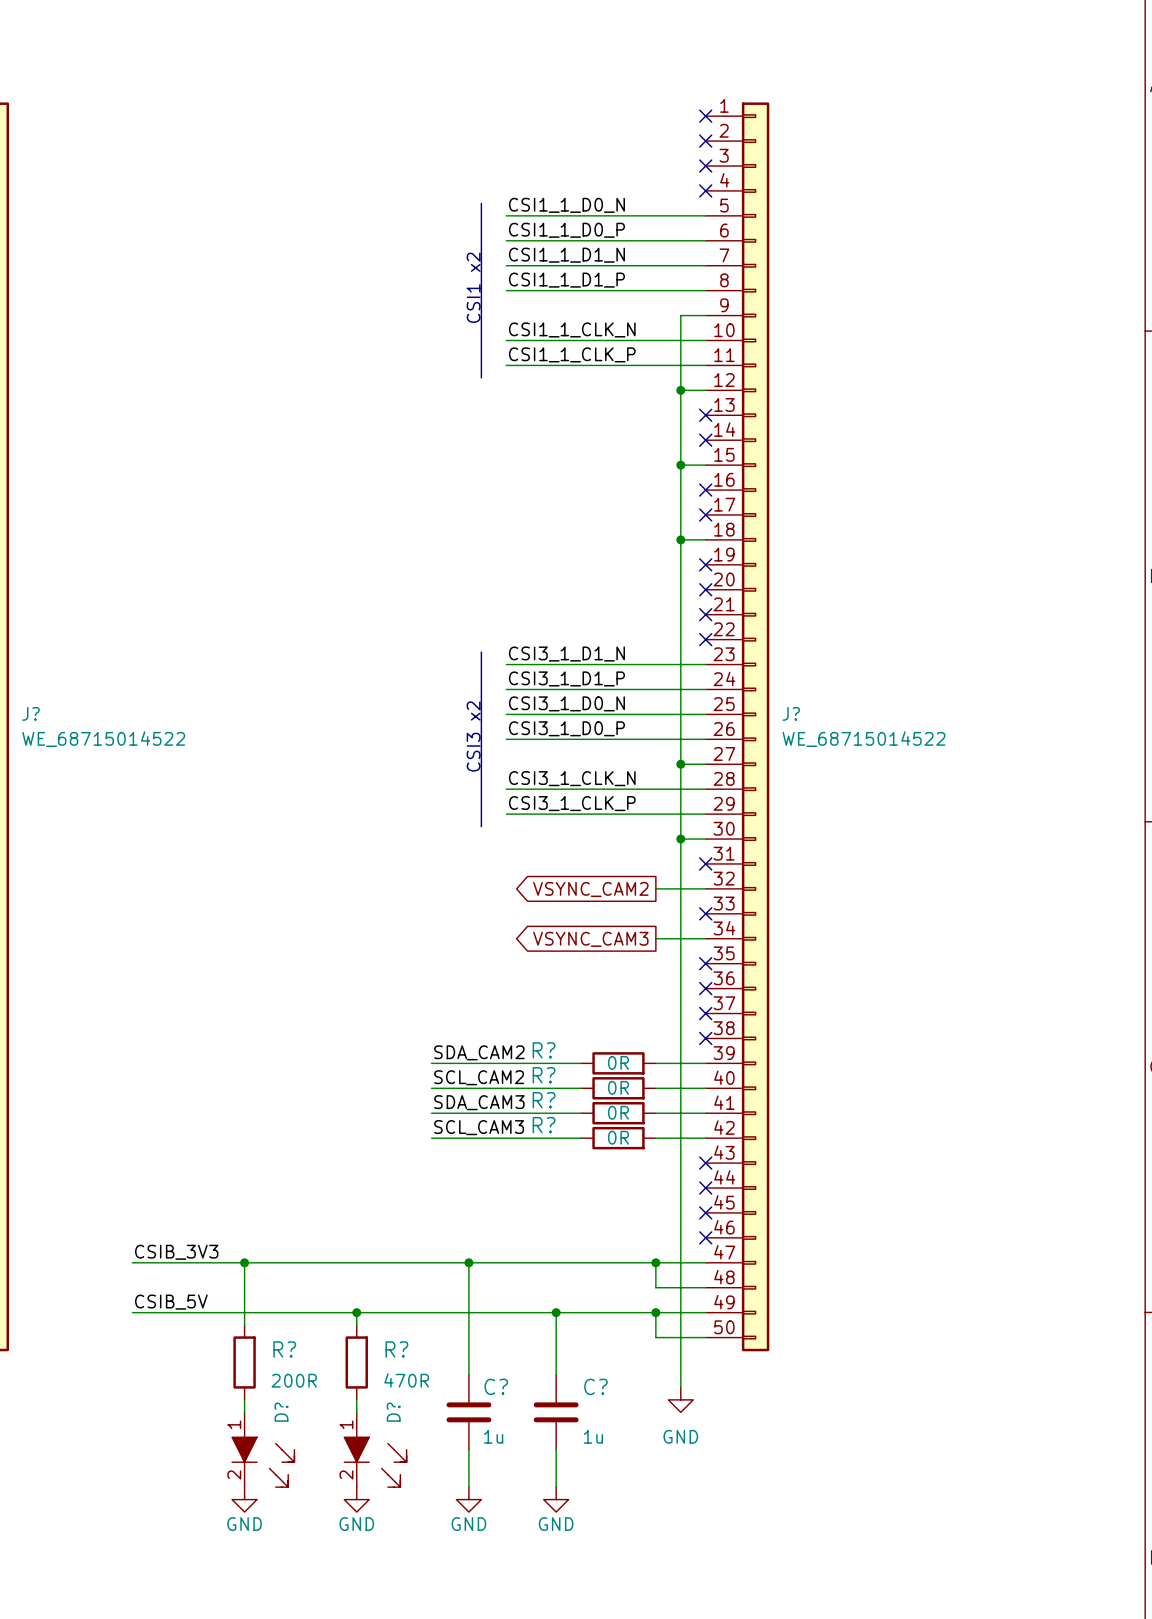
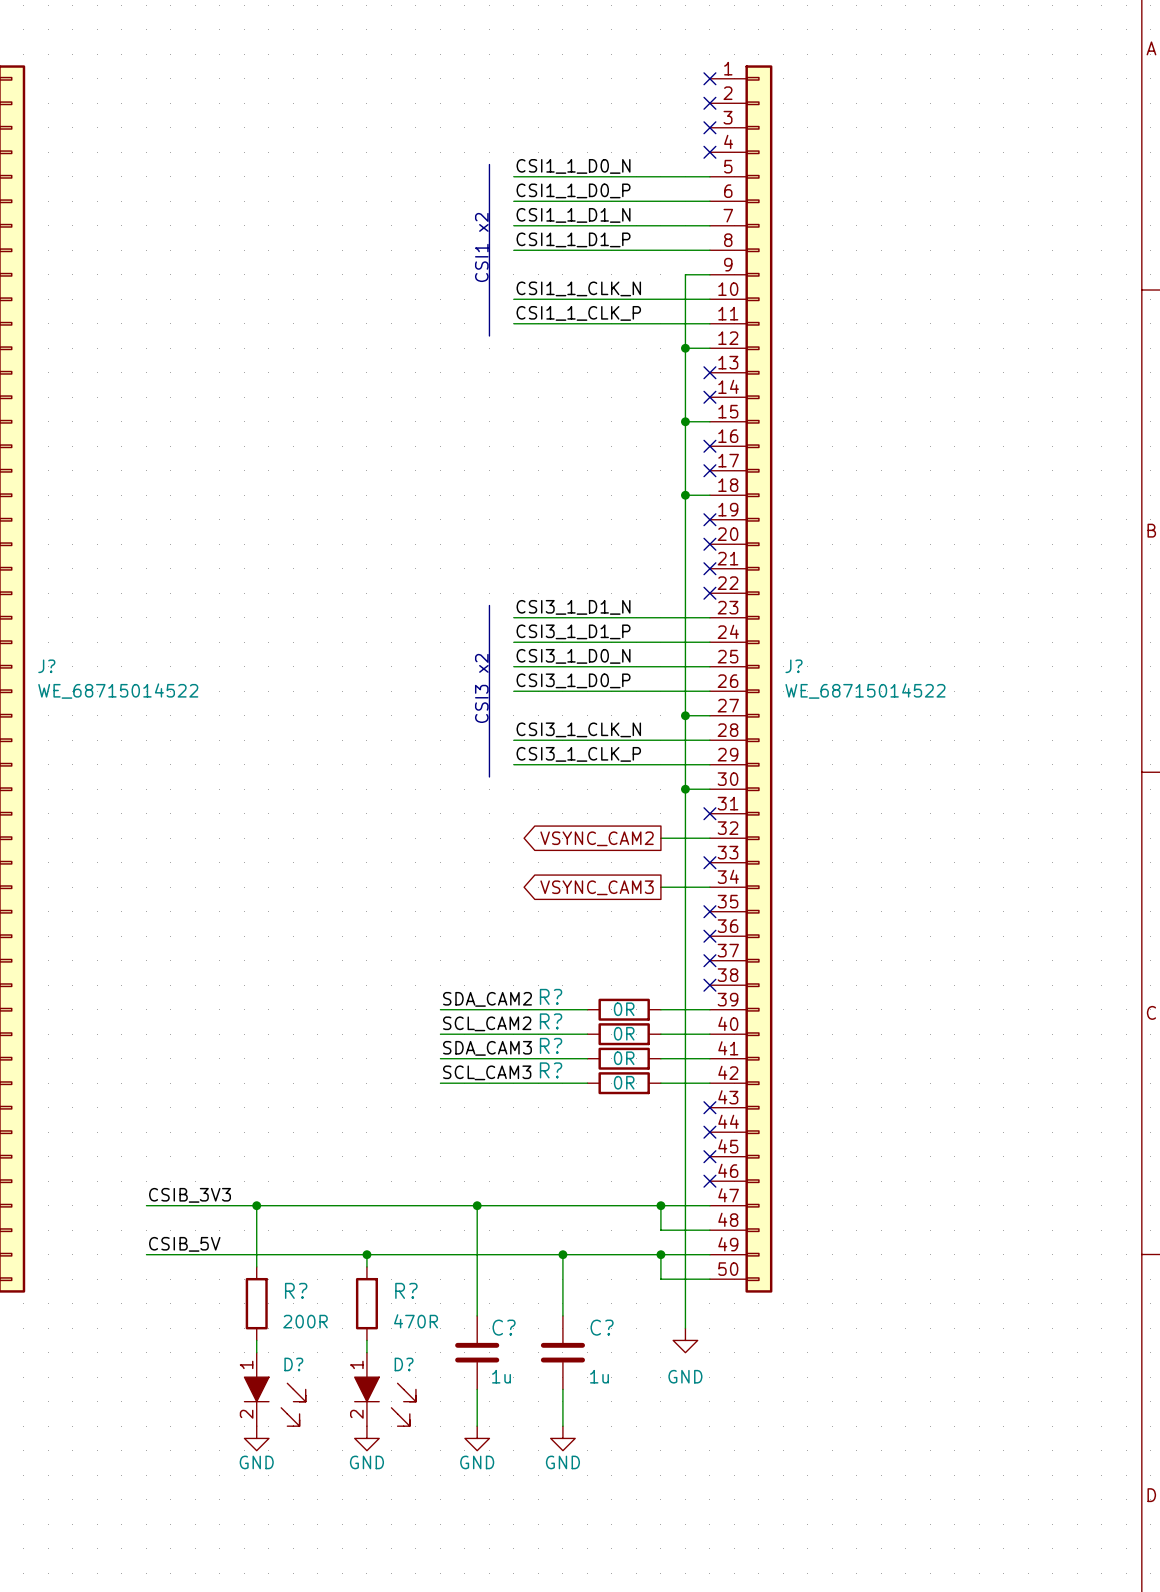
D? name rotation: 0° (281, 1412) -> 90° clockwise (293, 1364)
D? name rotation: 0° (393, 1412) -> 90° clockwise (404, 1364)

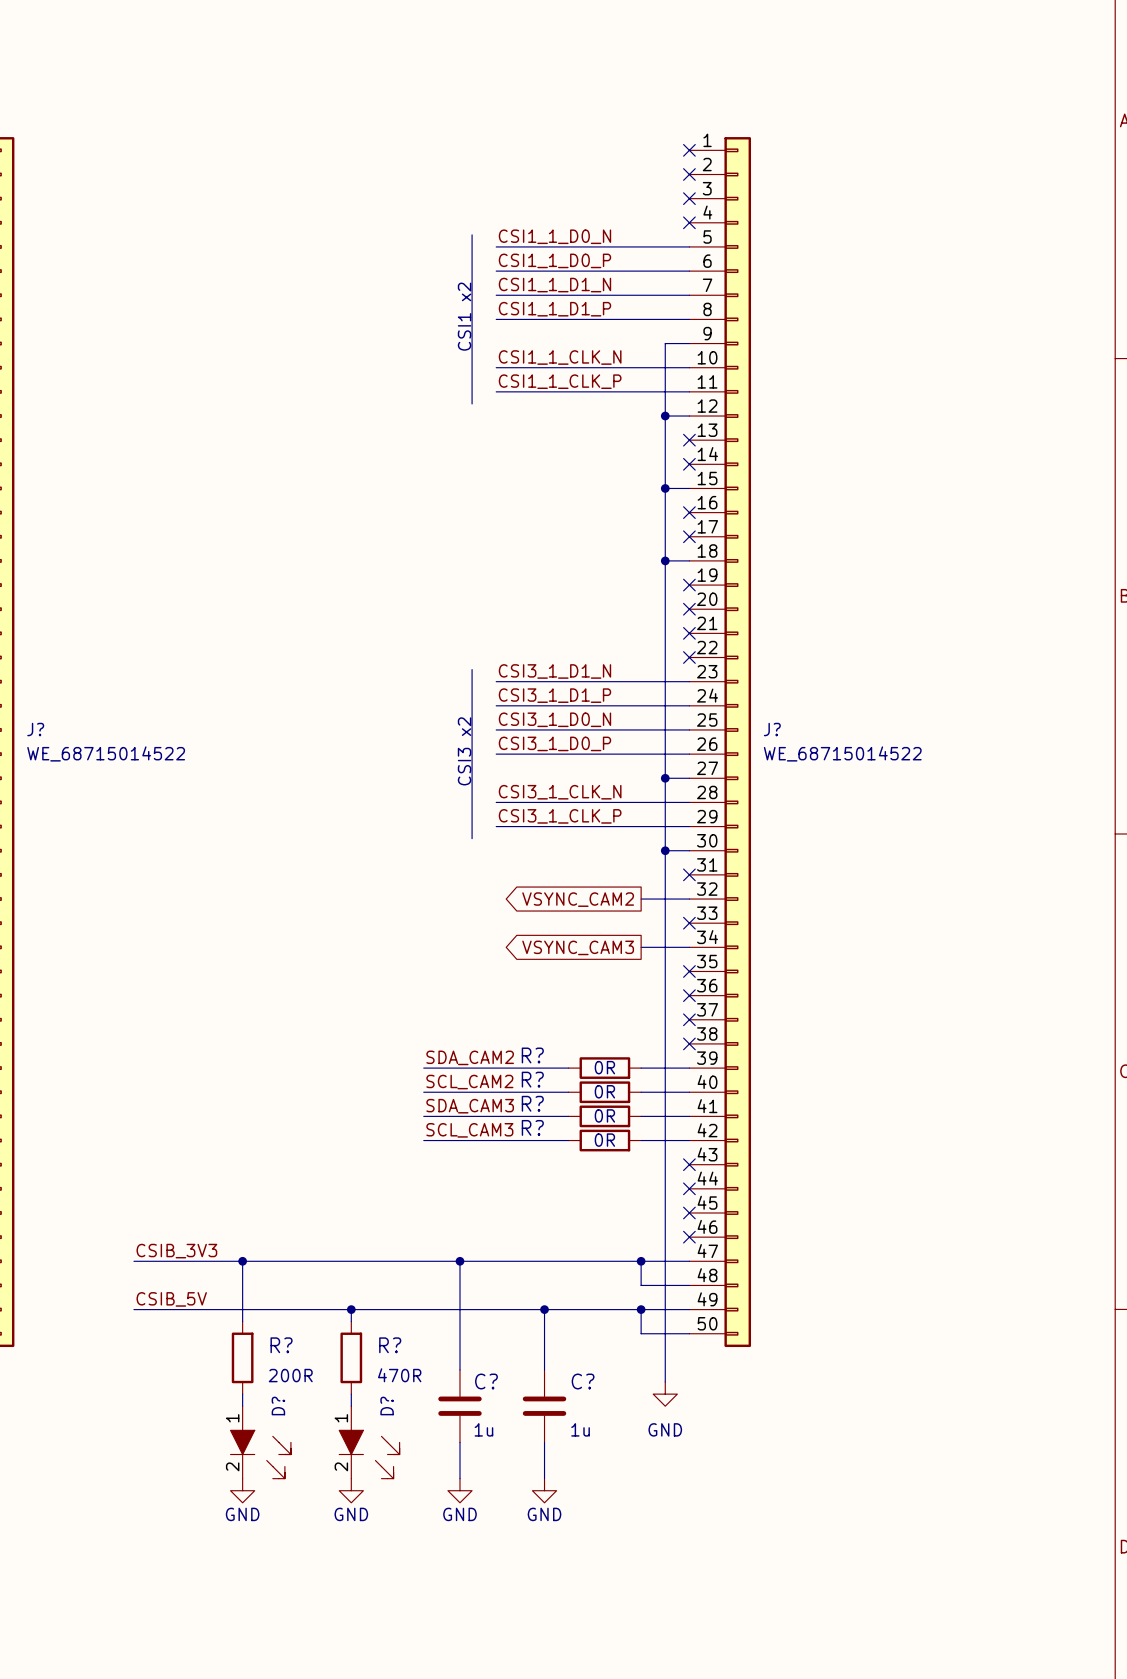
D? name rotation: 0° (293, 1364) -> 90° counterclockwise (278, 1406)
D? name rotation: 0° (404, 1364) -> 90° counterclockwise (387, 1406)

